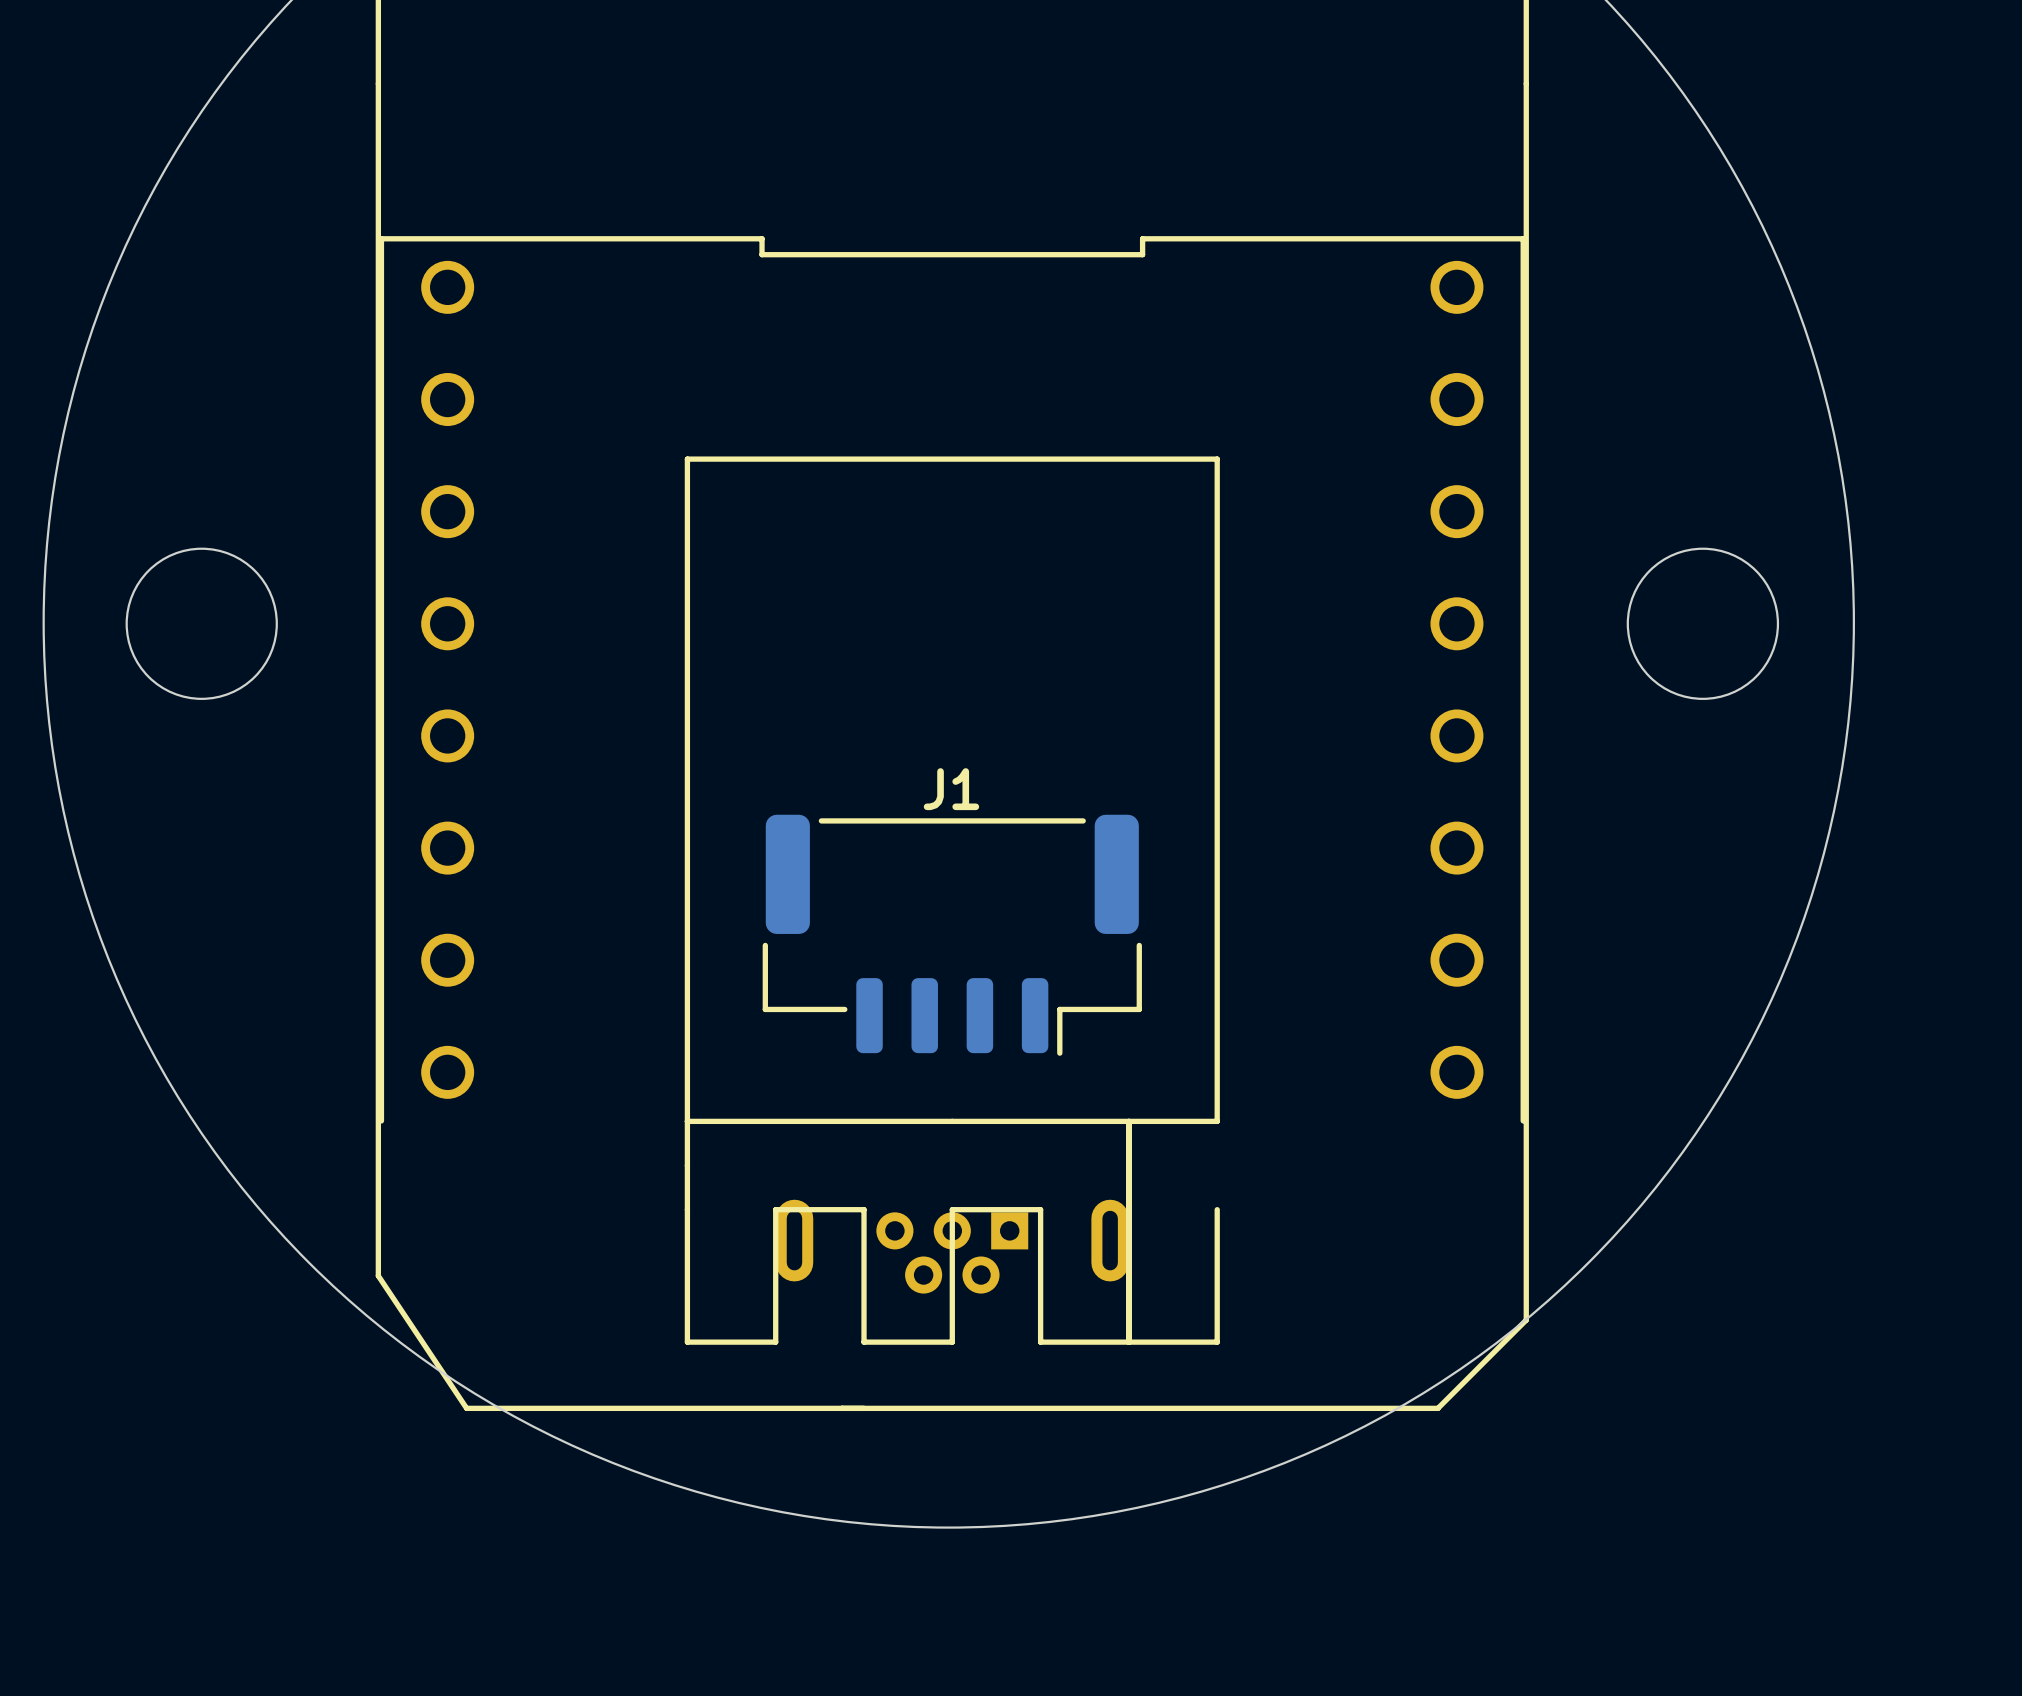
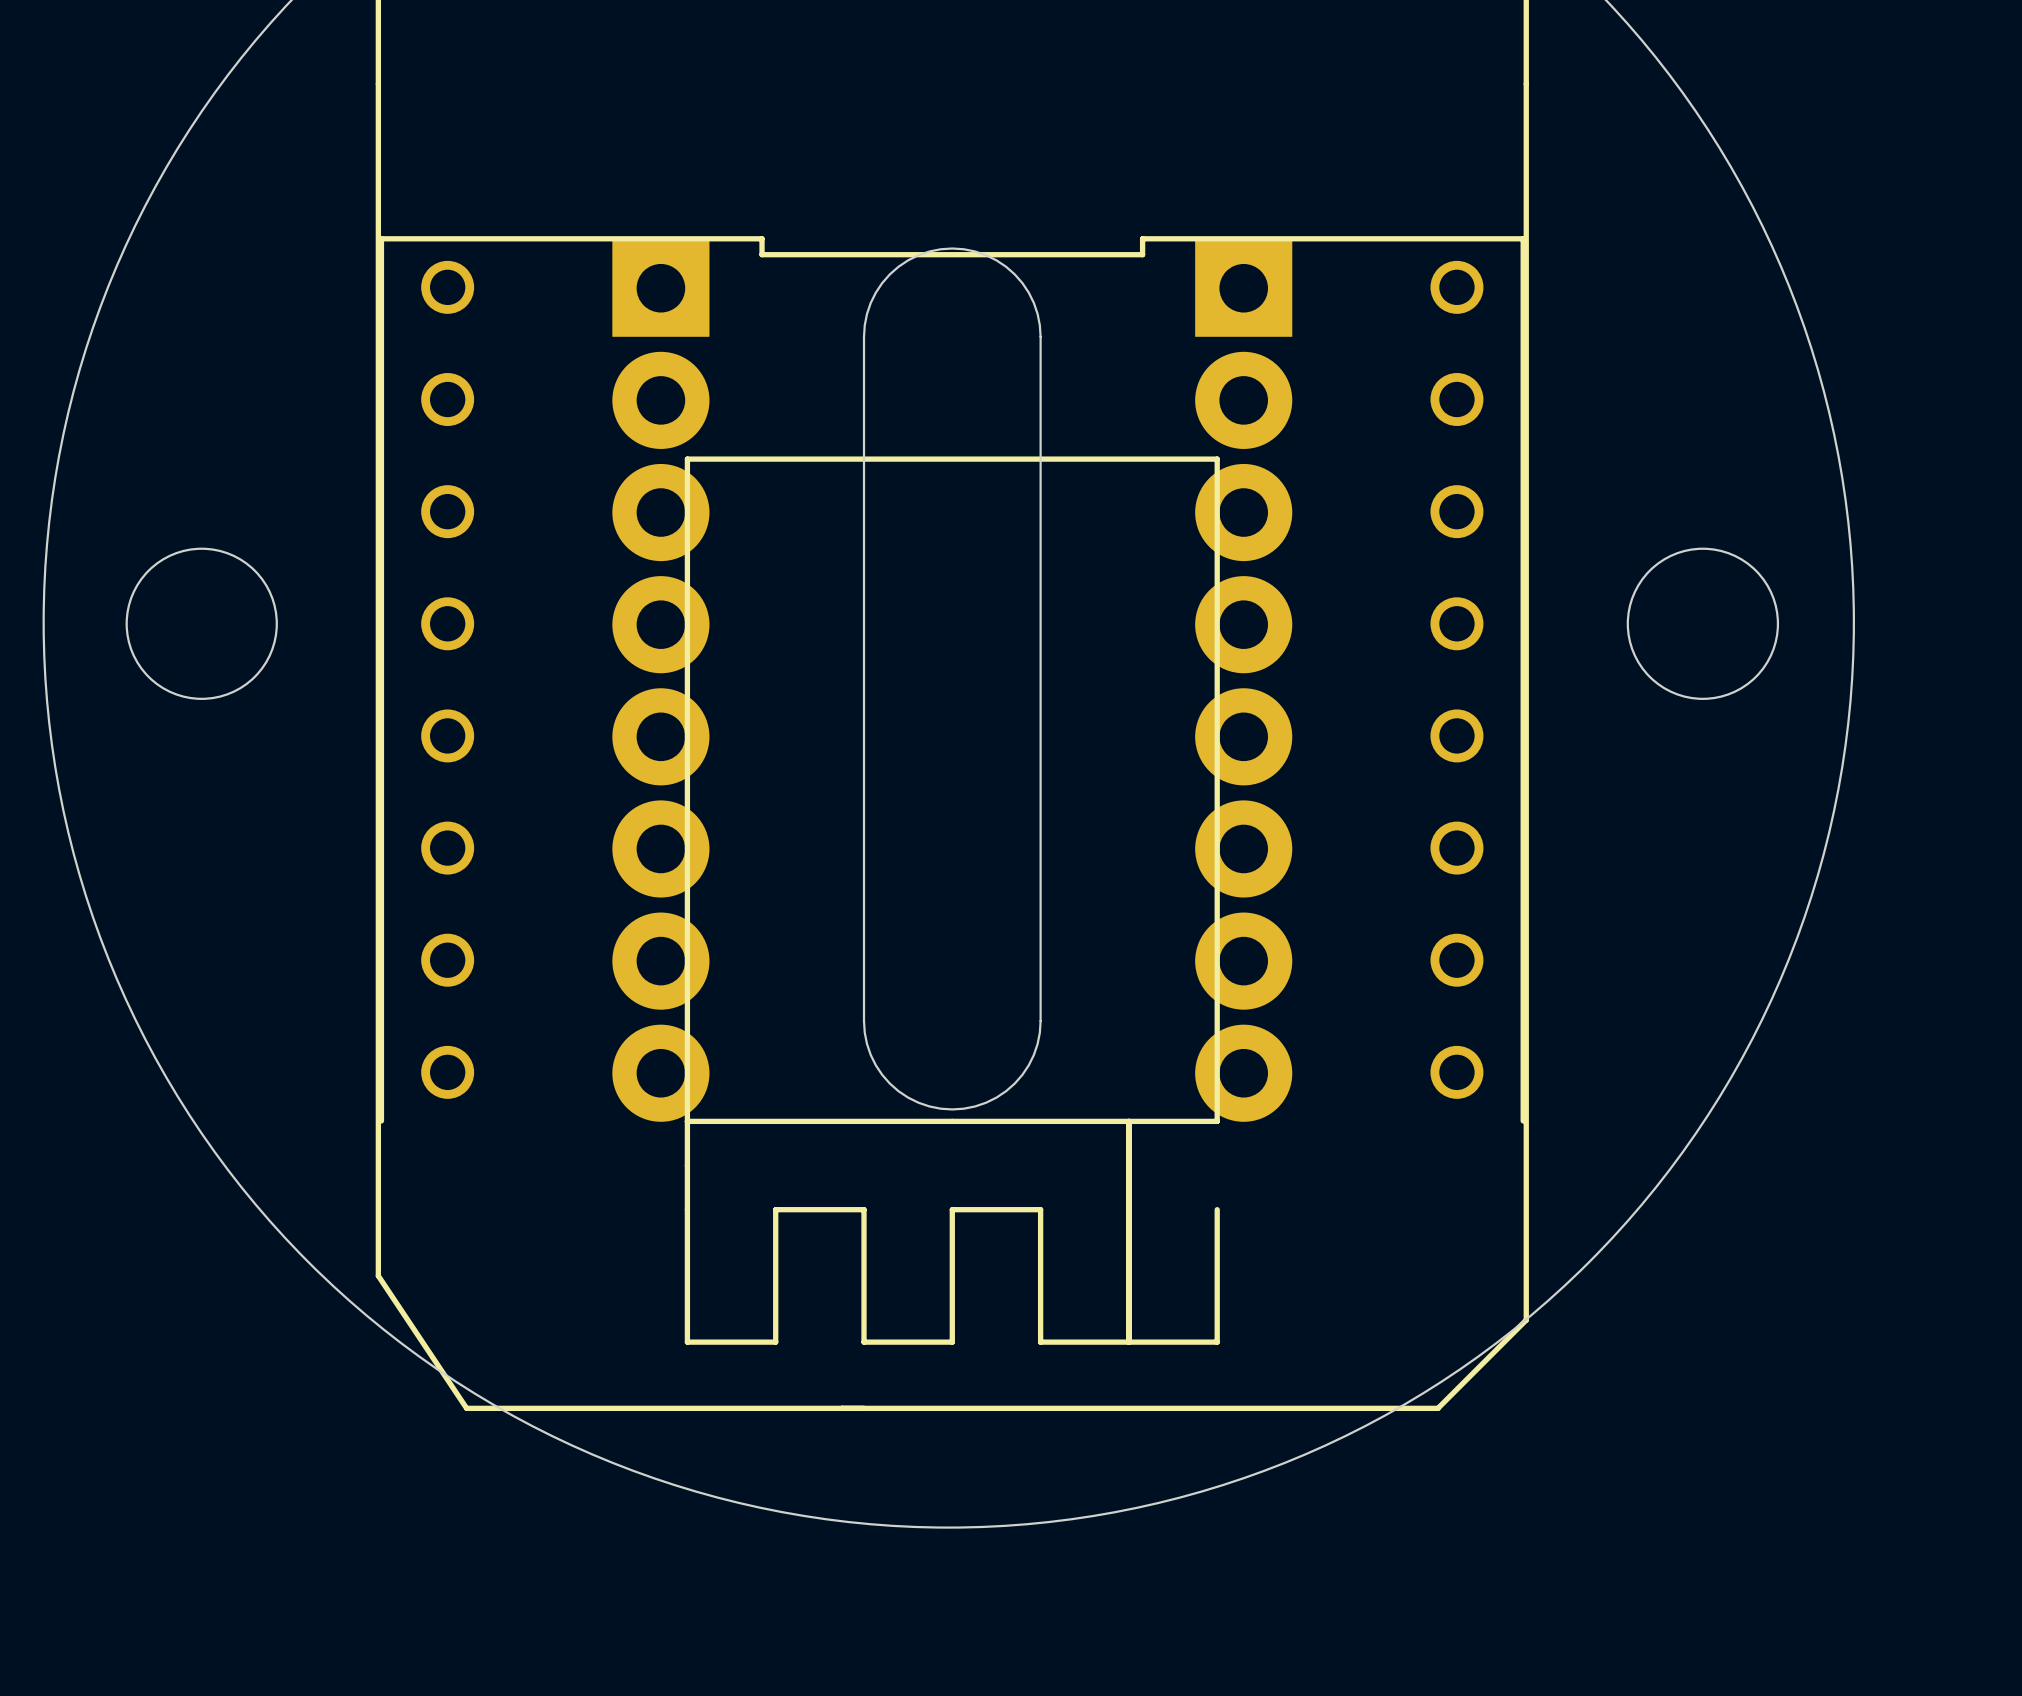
board edge: none -> (1040, 336) (1039, 1032) (1037, 1044) (1028, 1065) (1014, 1083) (1006, 1091) (986, 1102) (975, 1106) (952, 1109) (940, 1108) (918, 1102) (898, 1091) (889, 1083) (875, 1065) (867, 1044) (864, 1032) (864, 325) (867, 313) (875, 292) (889, 274) (898, 266) (918, 255) (929, 251) (952, 248) (975, 251) (986, 255) (1006, 266) (1014, 274) (1022, 283) (1033, 303) (1037, 313) (1040, 336)
part: none -> (660, 680)
part: none -> (1243, 680)
J1: (952, 935) -> none
part: (952, 1246) -> none

